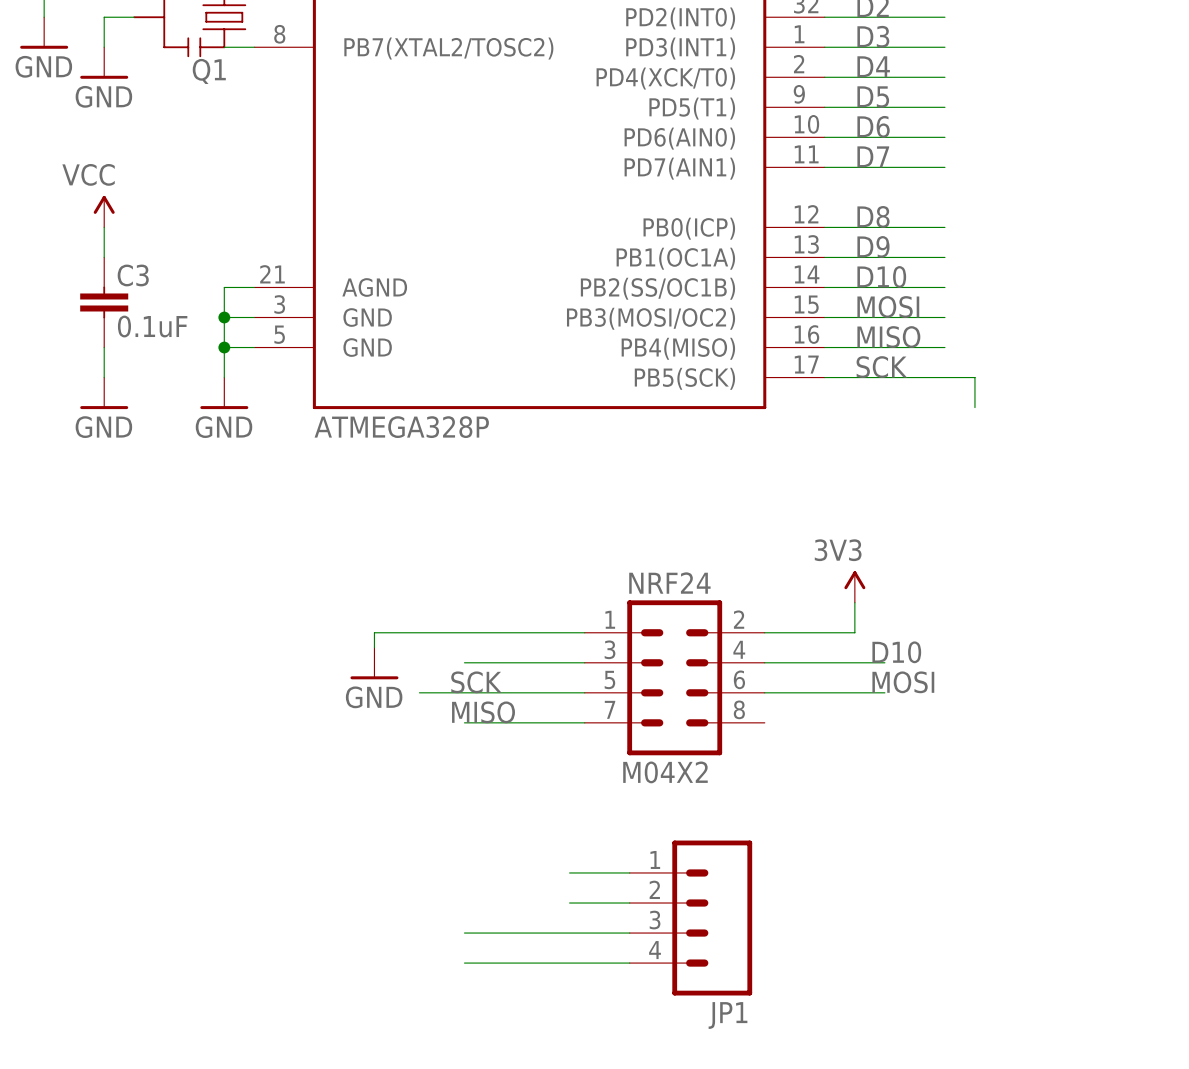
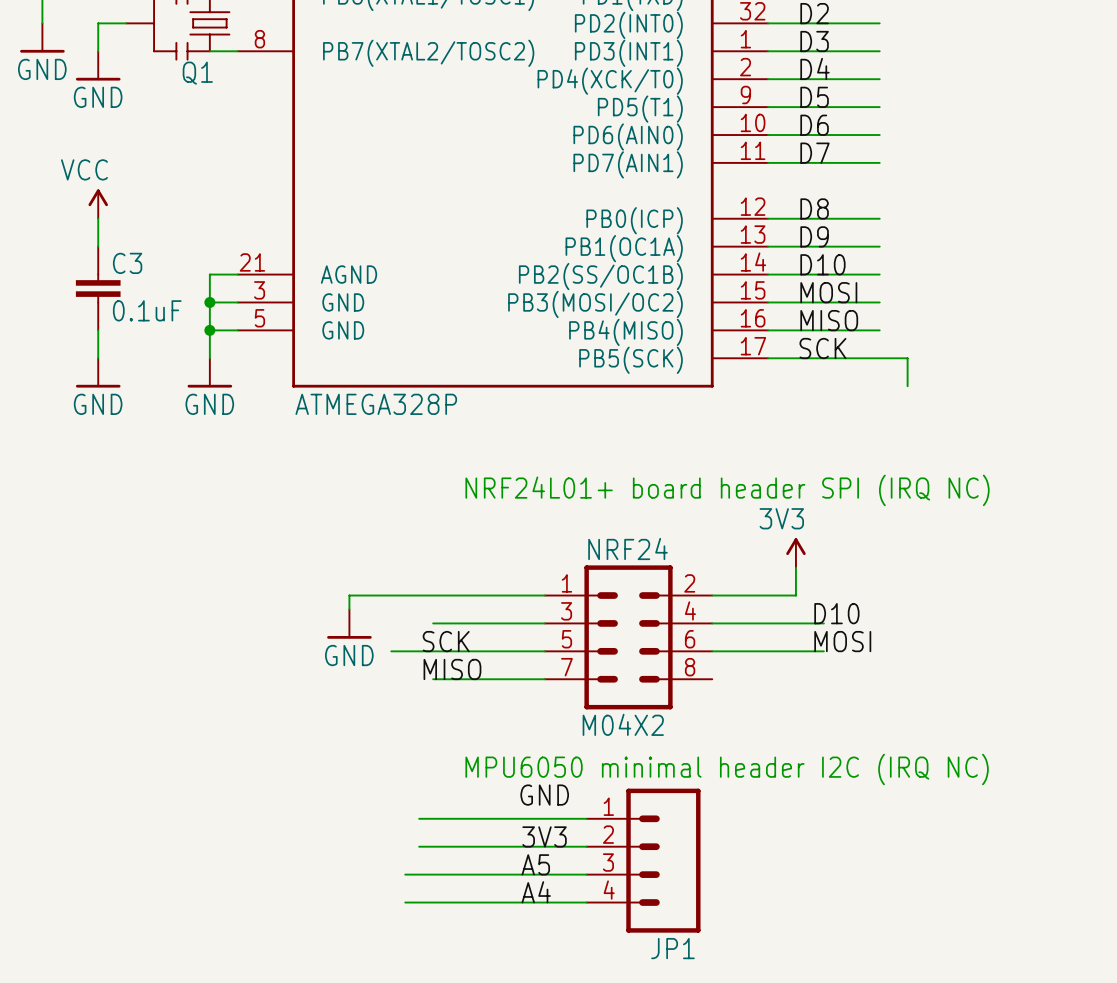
text: none -> NRF24L01+ board header SPI (IRQ NC) (727, 490)
text: none -> MPU6050 minimal header I2C (IRQ NC) (727, 769)
label: none -> GND (544, 795)
wire: none -> (419, 818) (530, 818)
label: none -> 3V3 (544, 836)
wire: none -> (419, 846) (530, 846)
label: none -> A5 (535, 864)
wire: none -> (405, 874) (433, 874)
label: none -> A4 (536, 892)
wire: none -> (405, 902) (433, 902)

